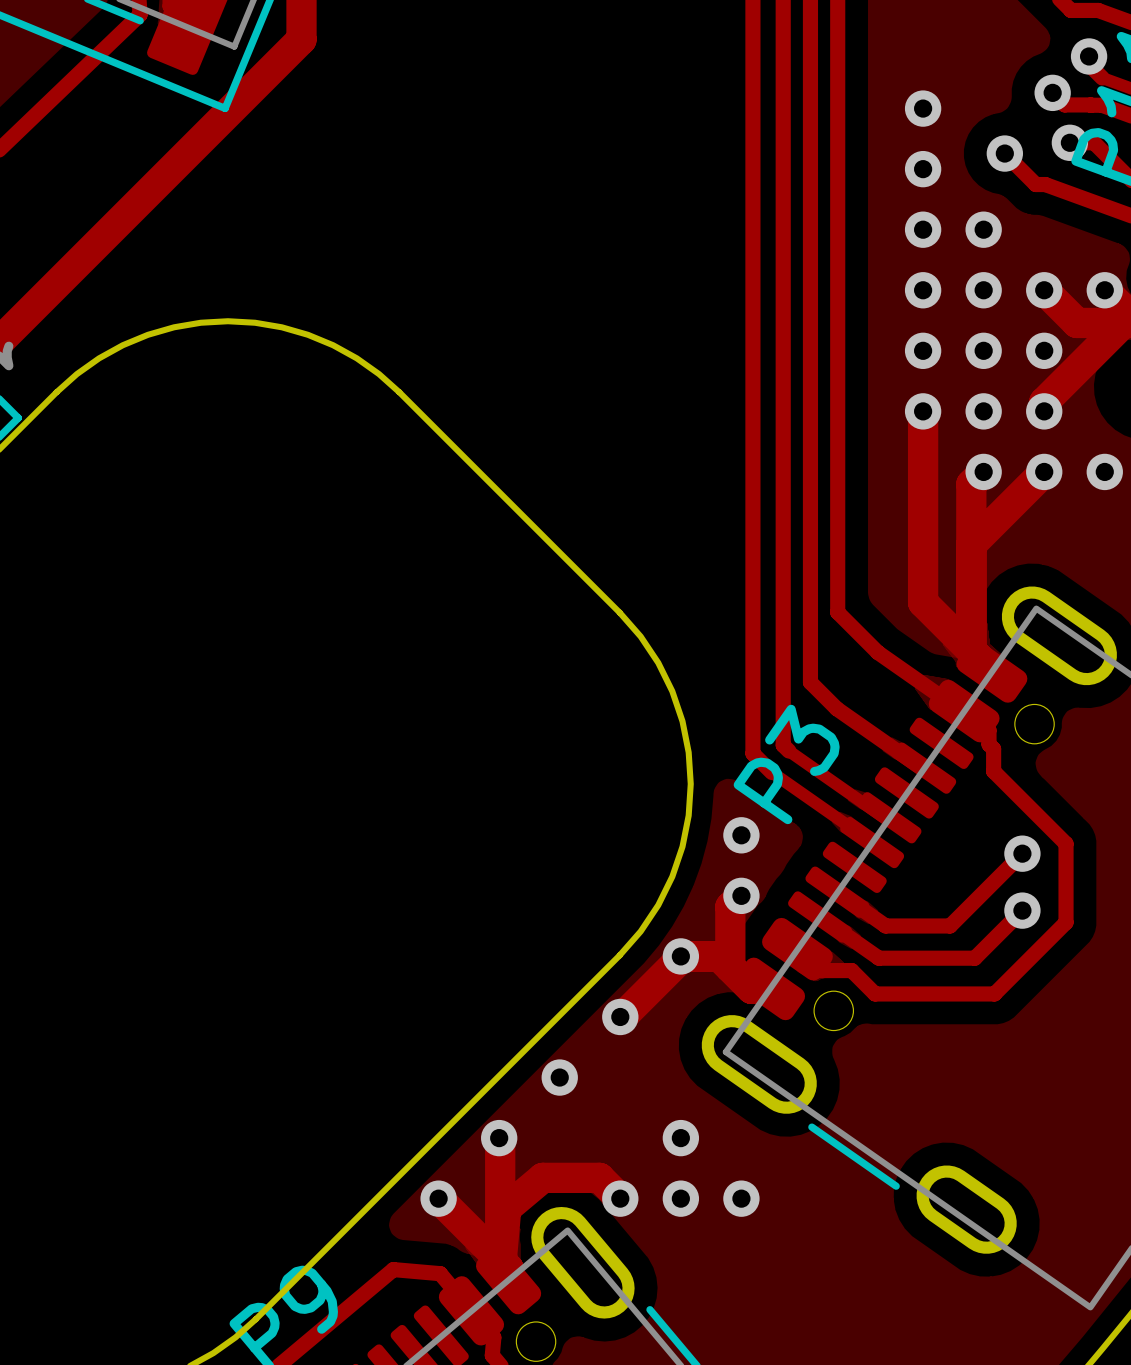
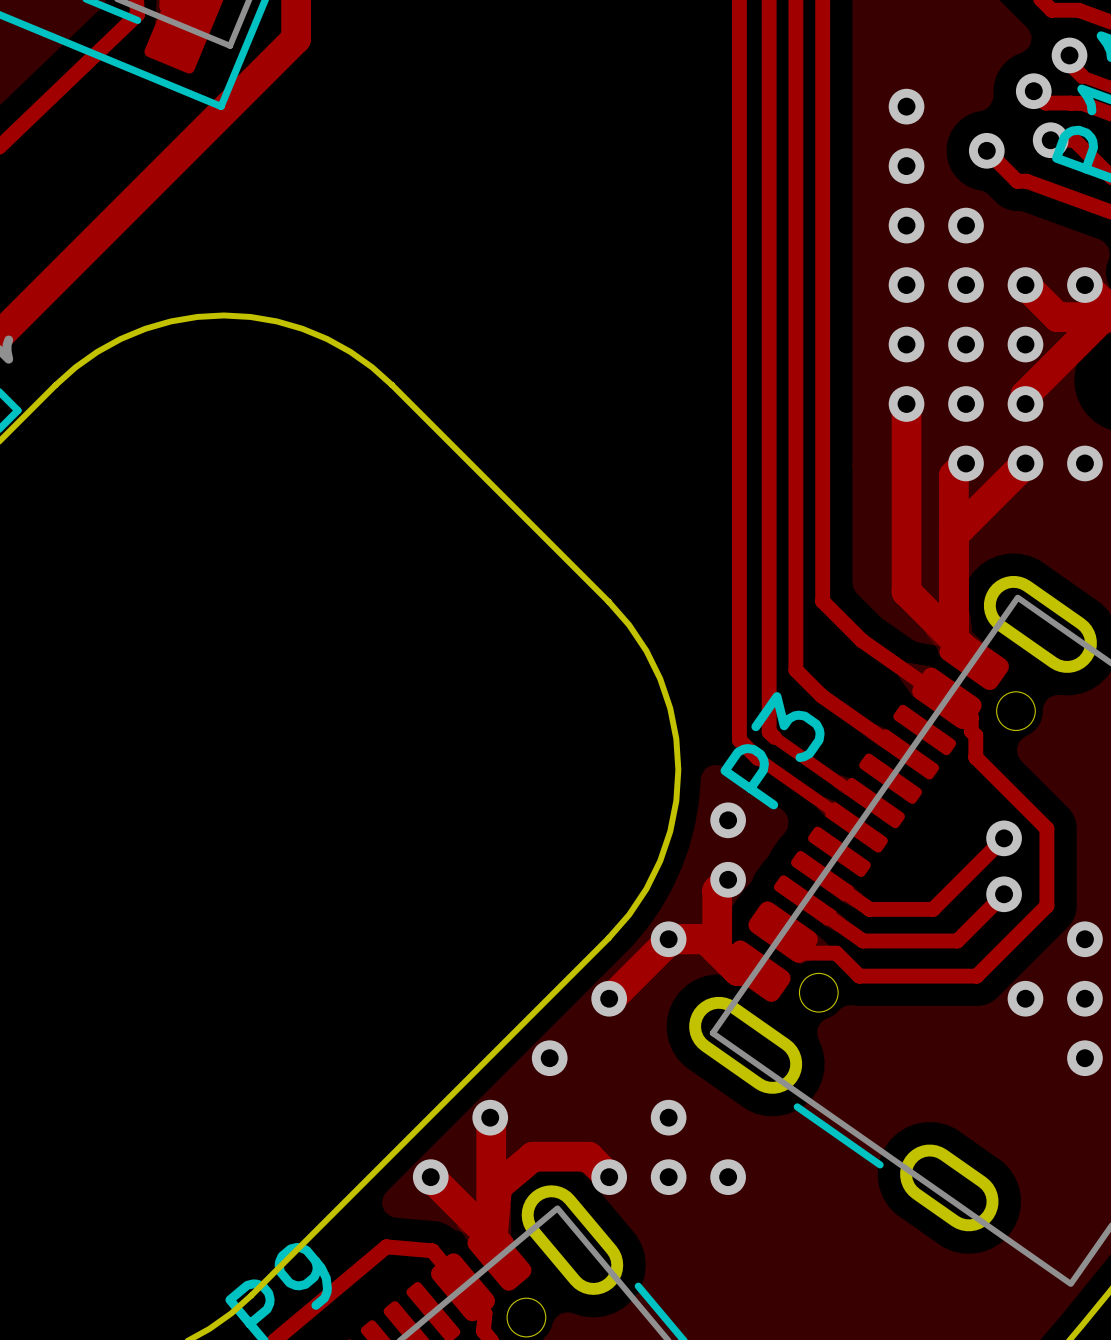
via: none -> (1084, 939)
via: none -> (1025, 998)
via: none -> (1084, 998)
via: none -> (1084, 1058)

